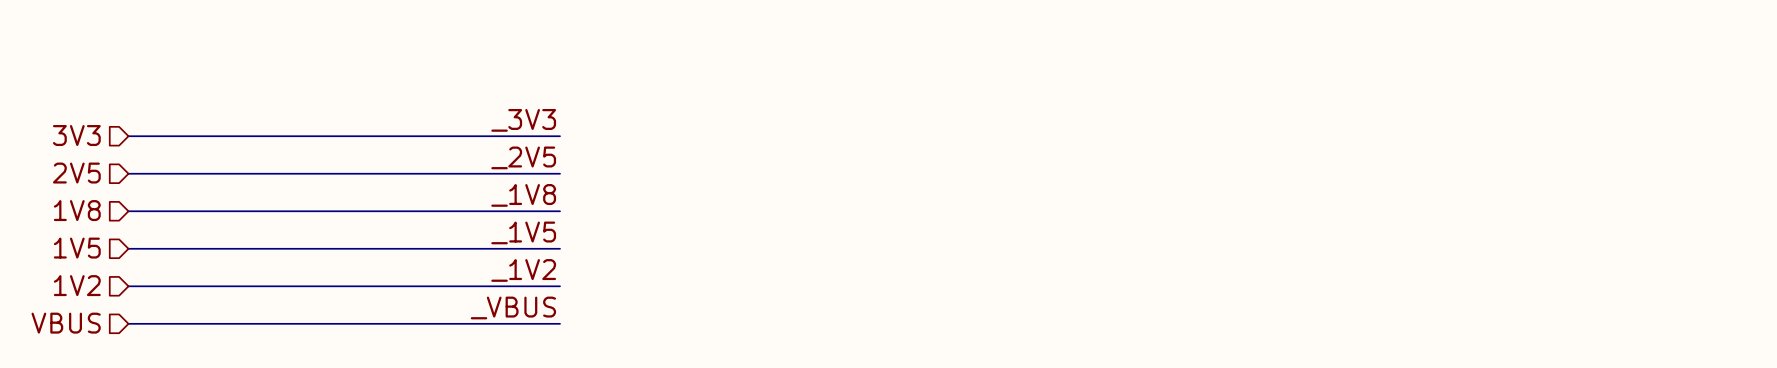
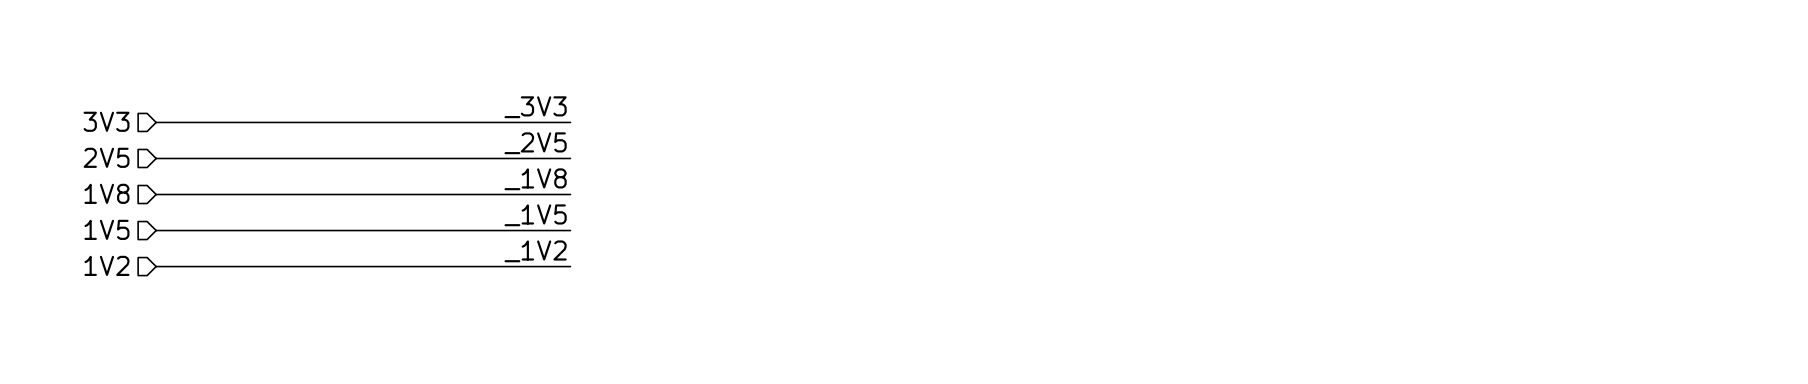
label: _VBUS (513, 307) -> none
hierarchical label: VBUS (66, 323) -> none
wire: (128, 323) (560, 323) -> none

